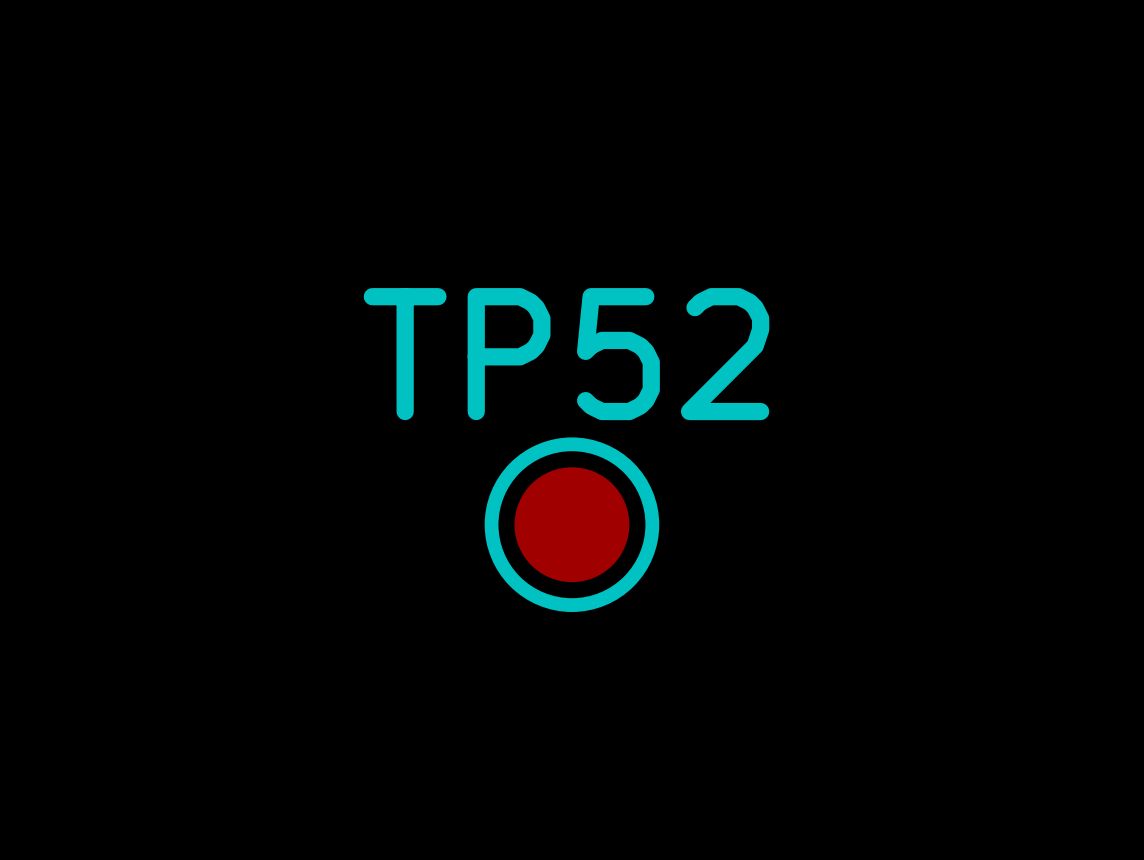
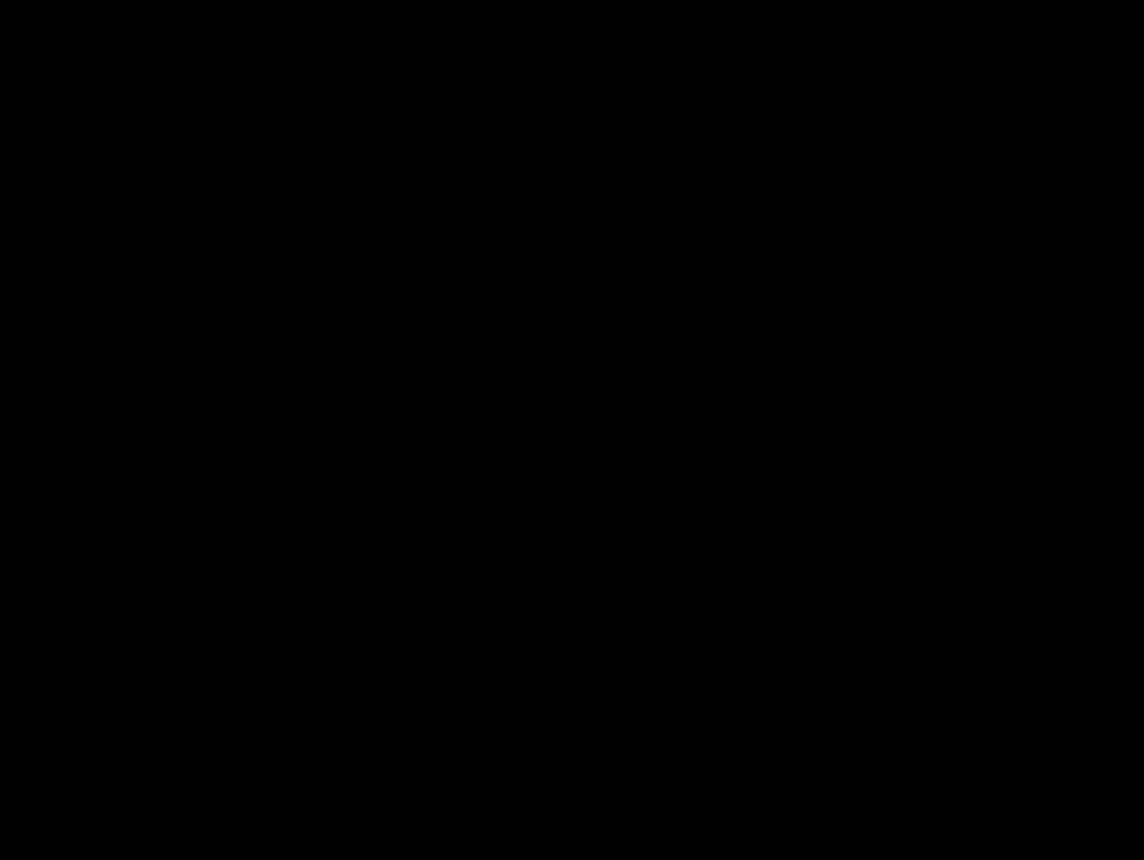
TP52: (571, 524) -> none

